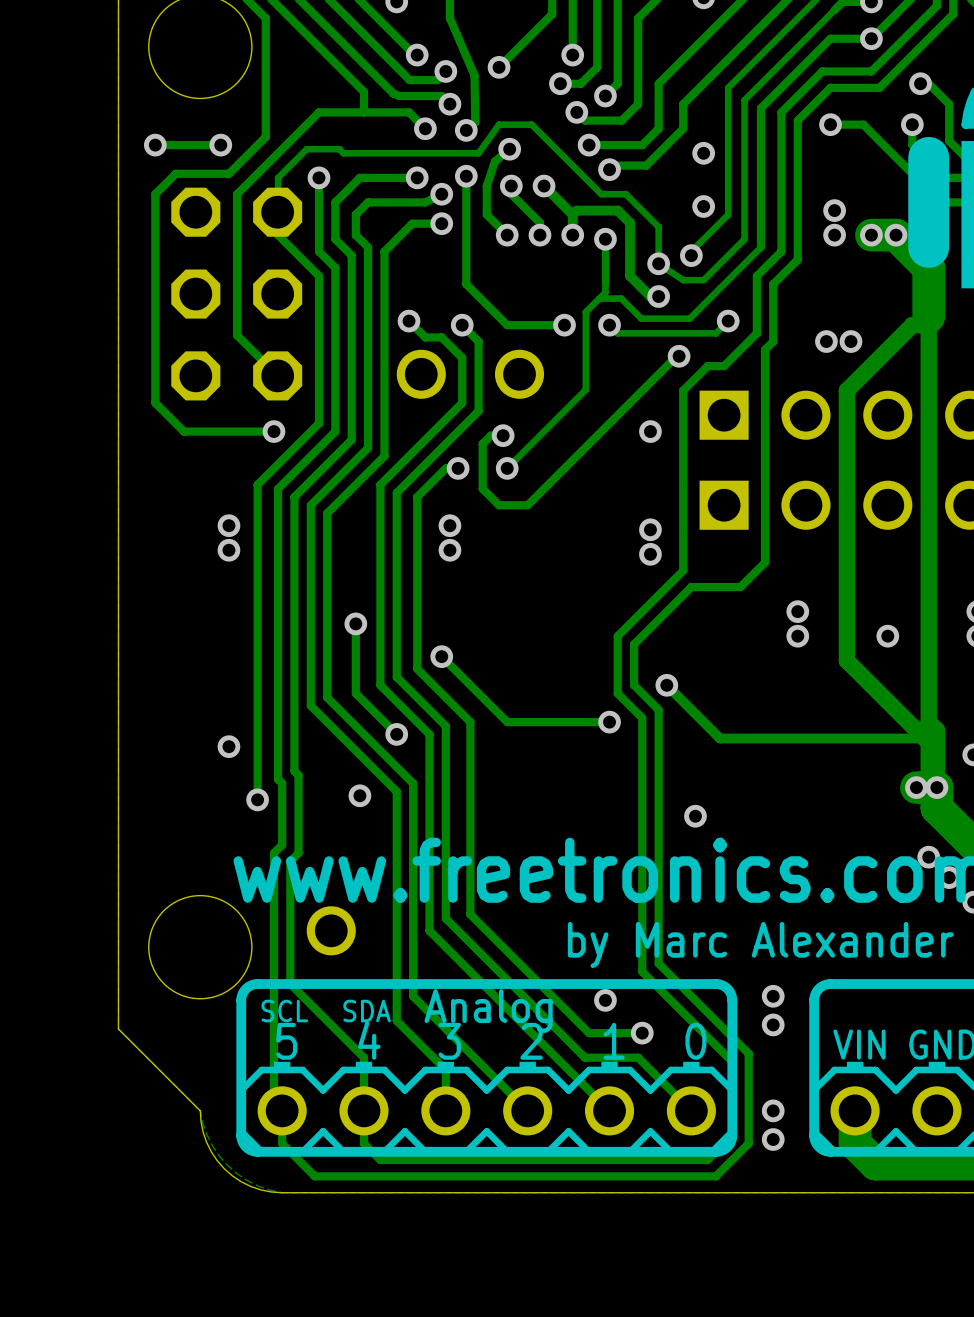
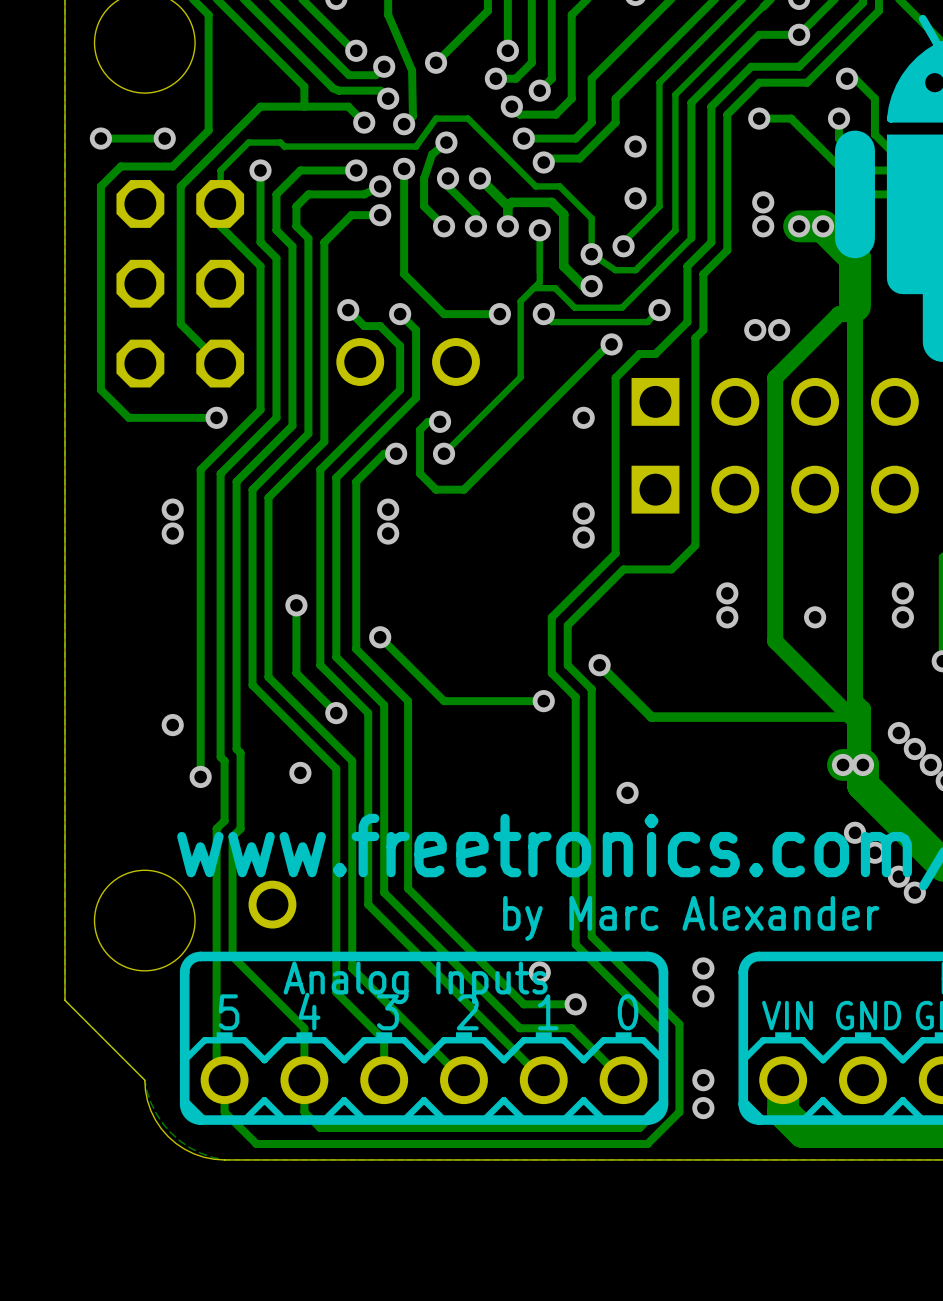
text: SCL (284, 1011) -> none
text: SDA (367, 1011) -> Analog Inputs (415, 982)
text: Analog (488, 1011) -> none

